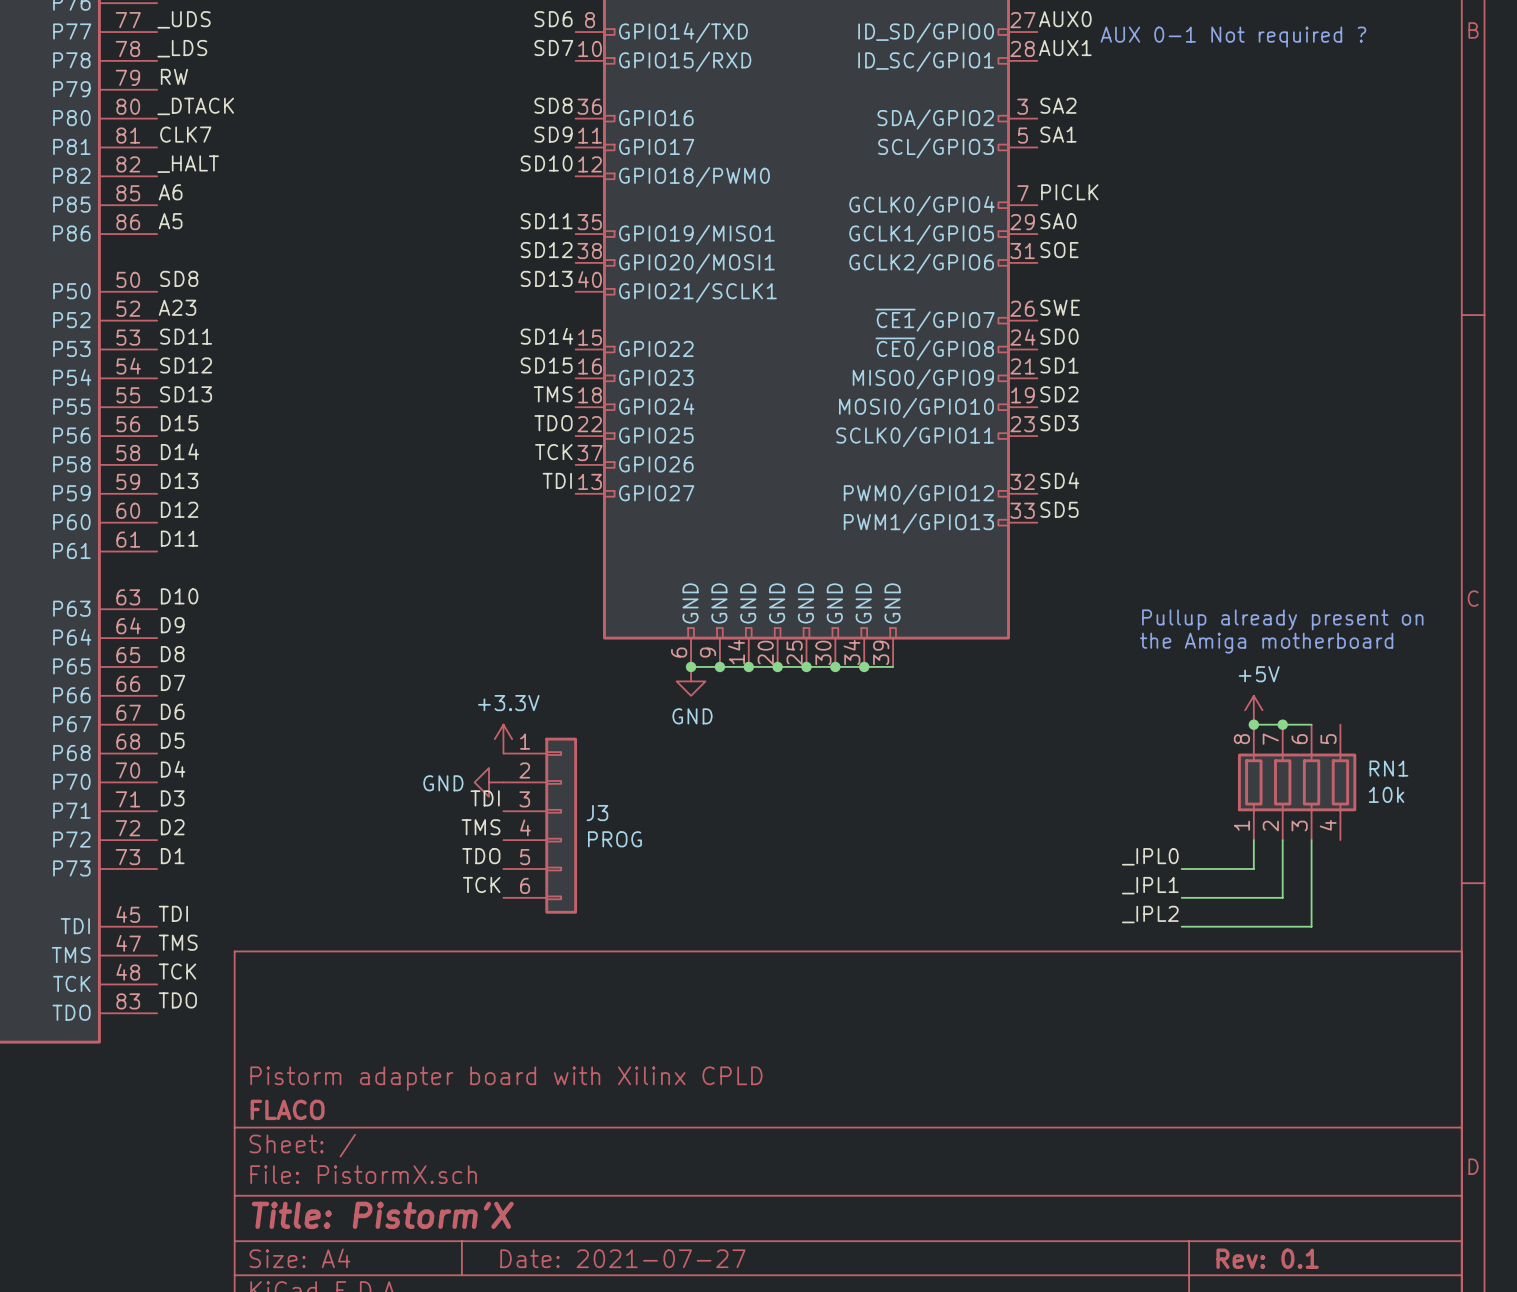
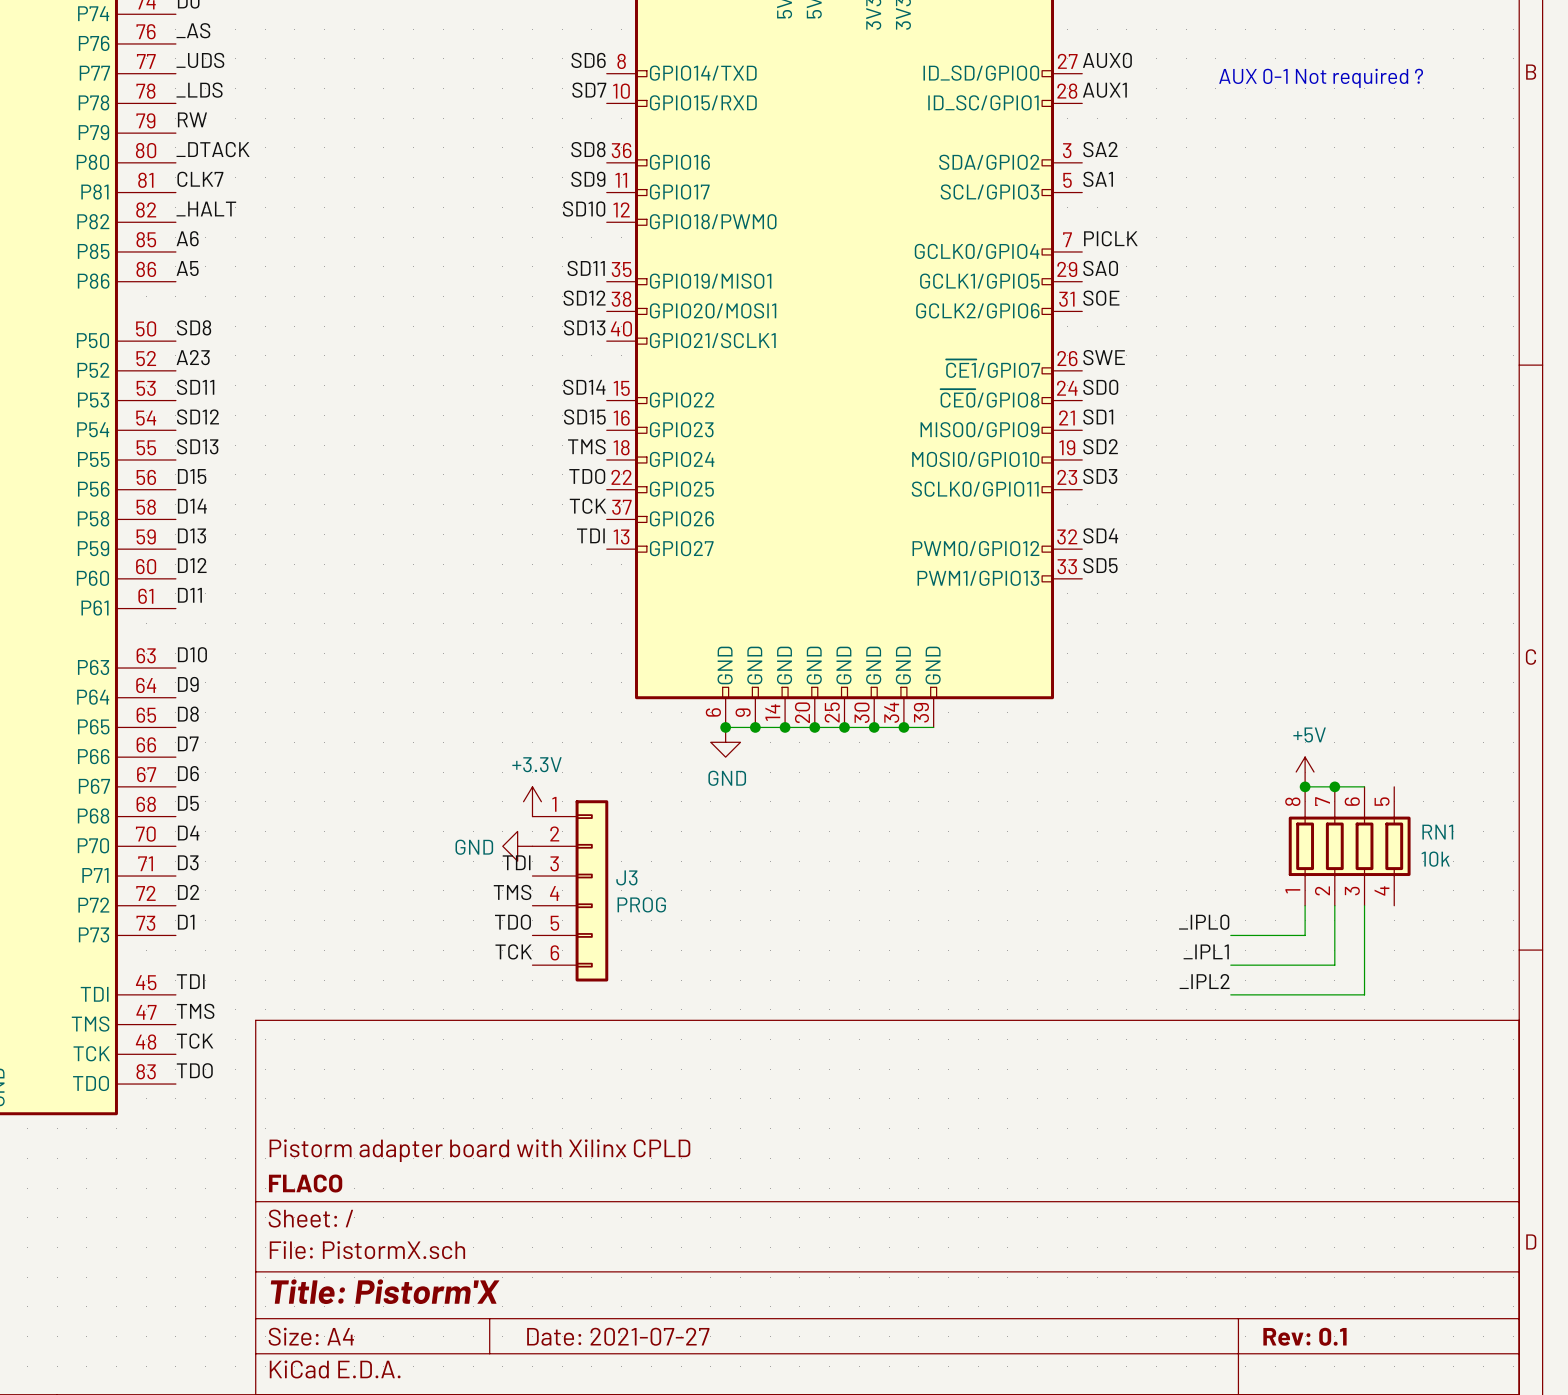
text: Pullup already present on (1282, 619) -> none
text: the Amiga motherboard (1266, 643) -> none

